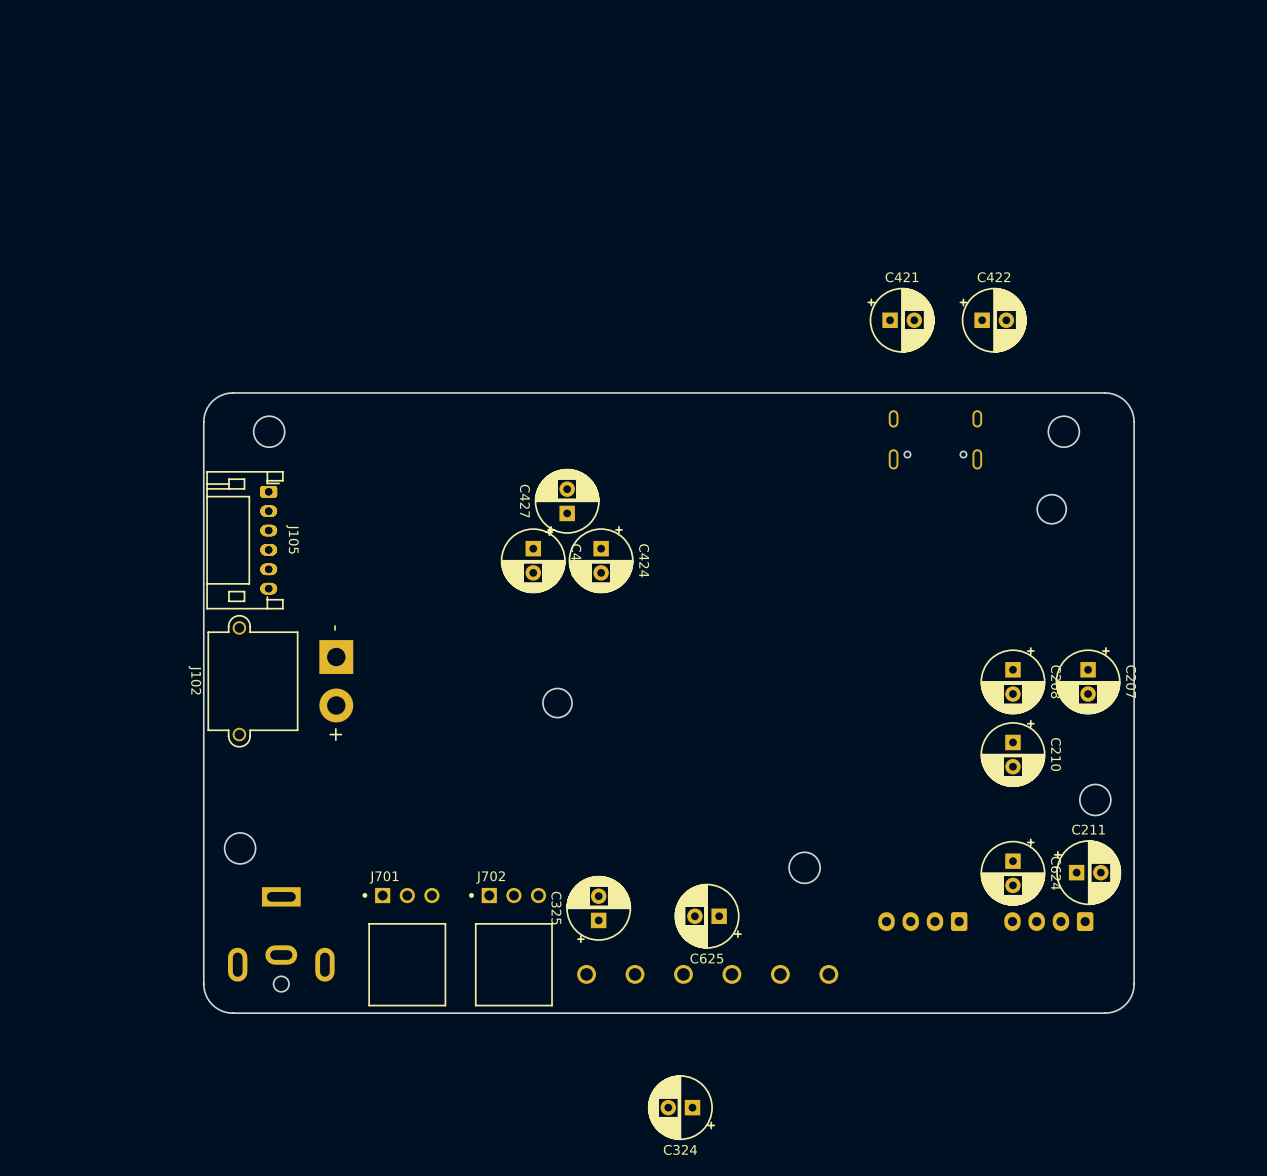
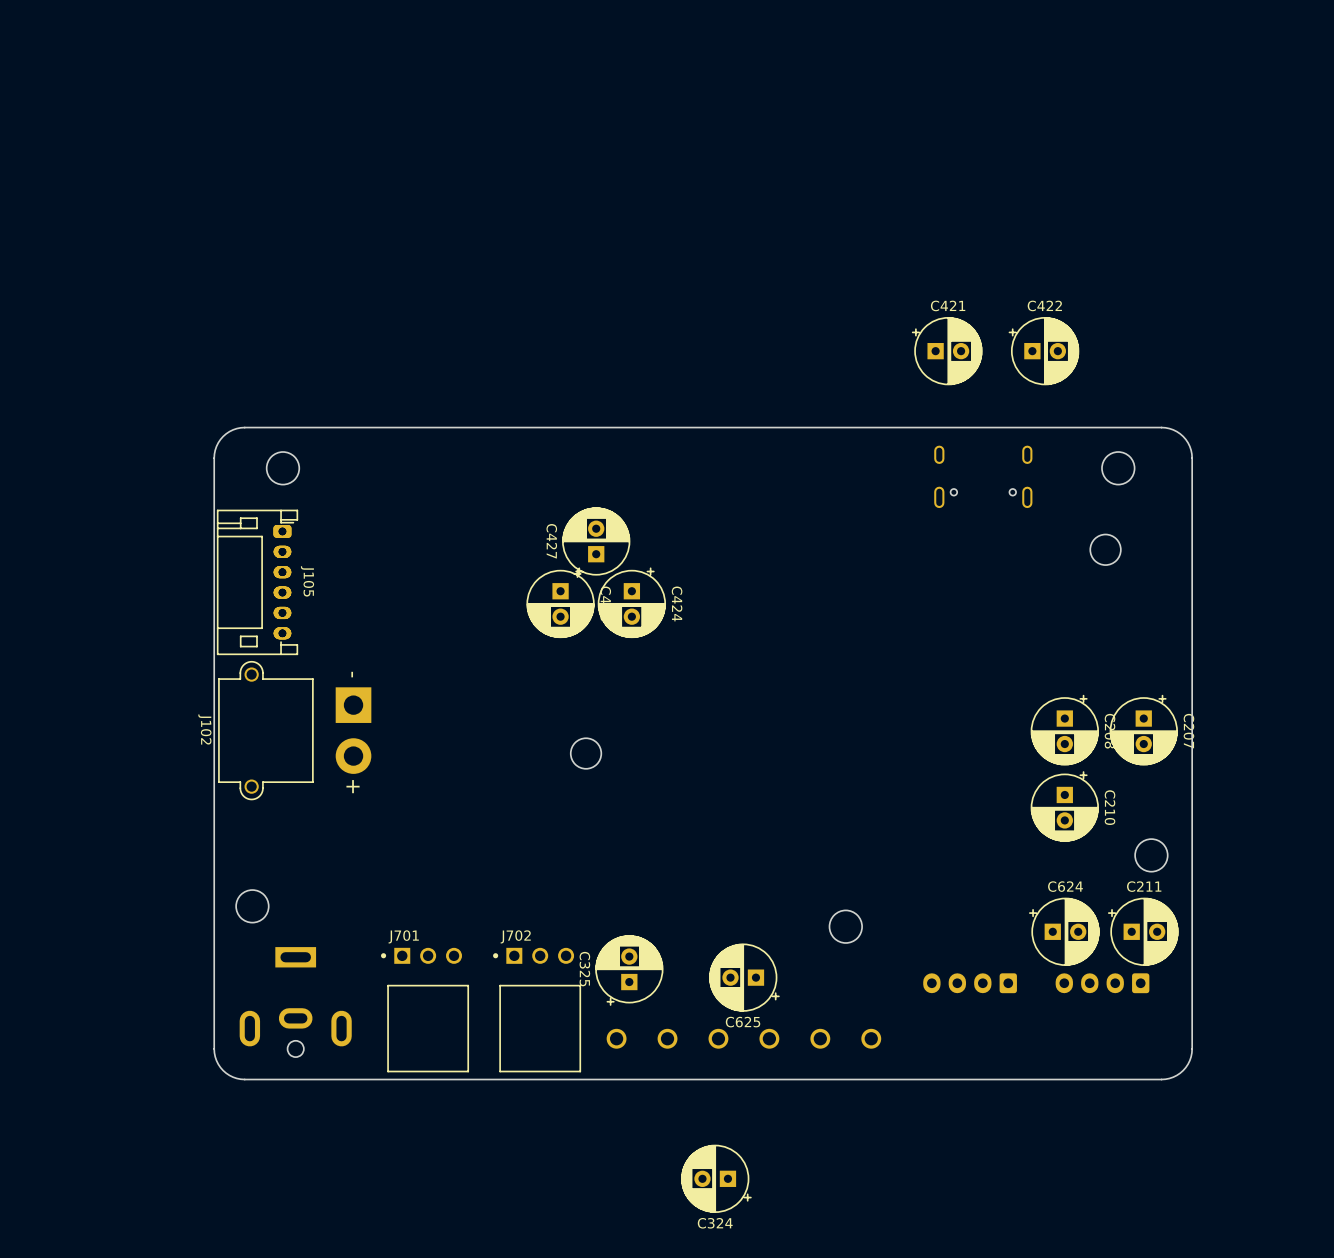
C624 rotation: 0° (1012, 872) -> 90° counterclockwise (1064, 931)

